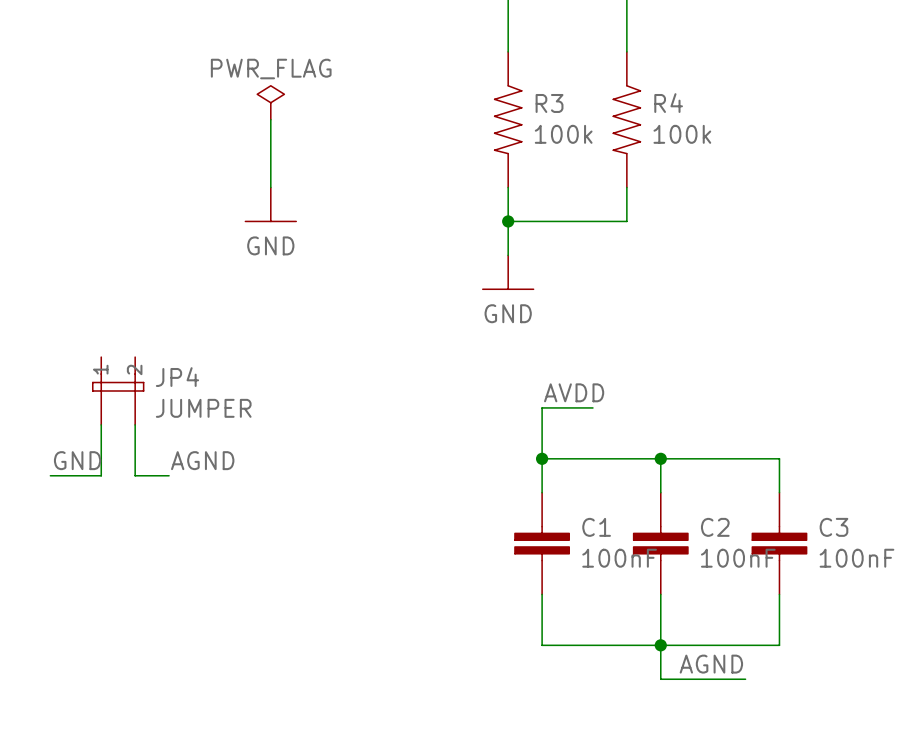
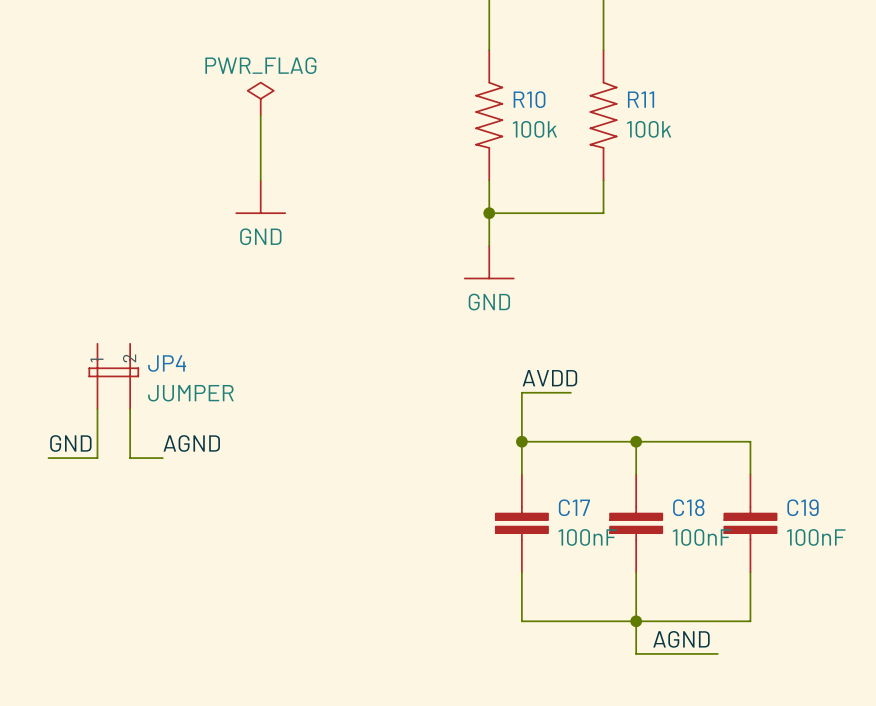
R3 name: R3 (549, 103) -> R10 (529, 99)
R4 name: R4 (668, 103) -> R11 (641, 99)
C1 name: C1 (596, 527) -> C17 (574, 507)
C2 name: C2 (715, 527) -> C18 (688, 507)
C3 name: C3 (833, 527) -> C19 (803, 507)

